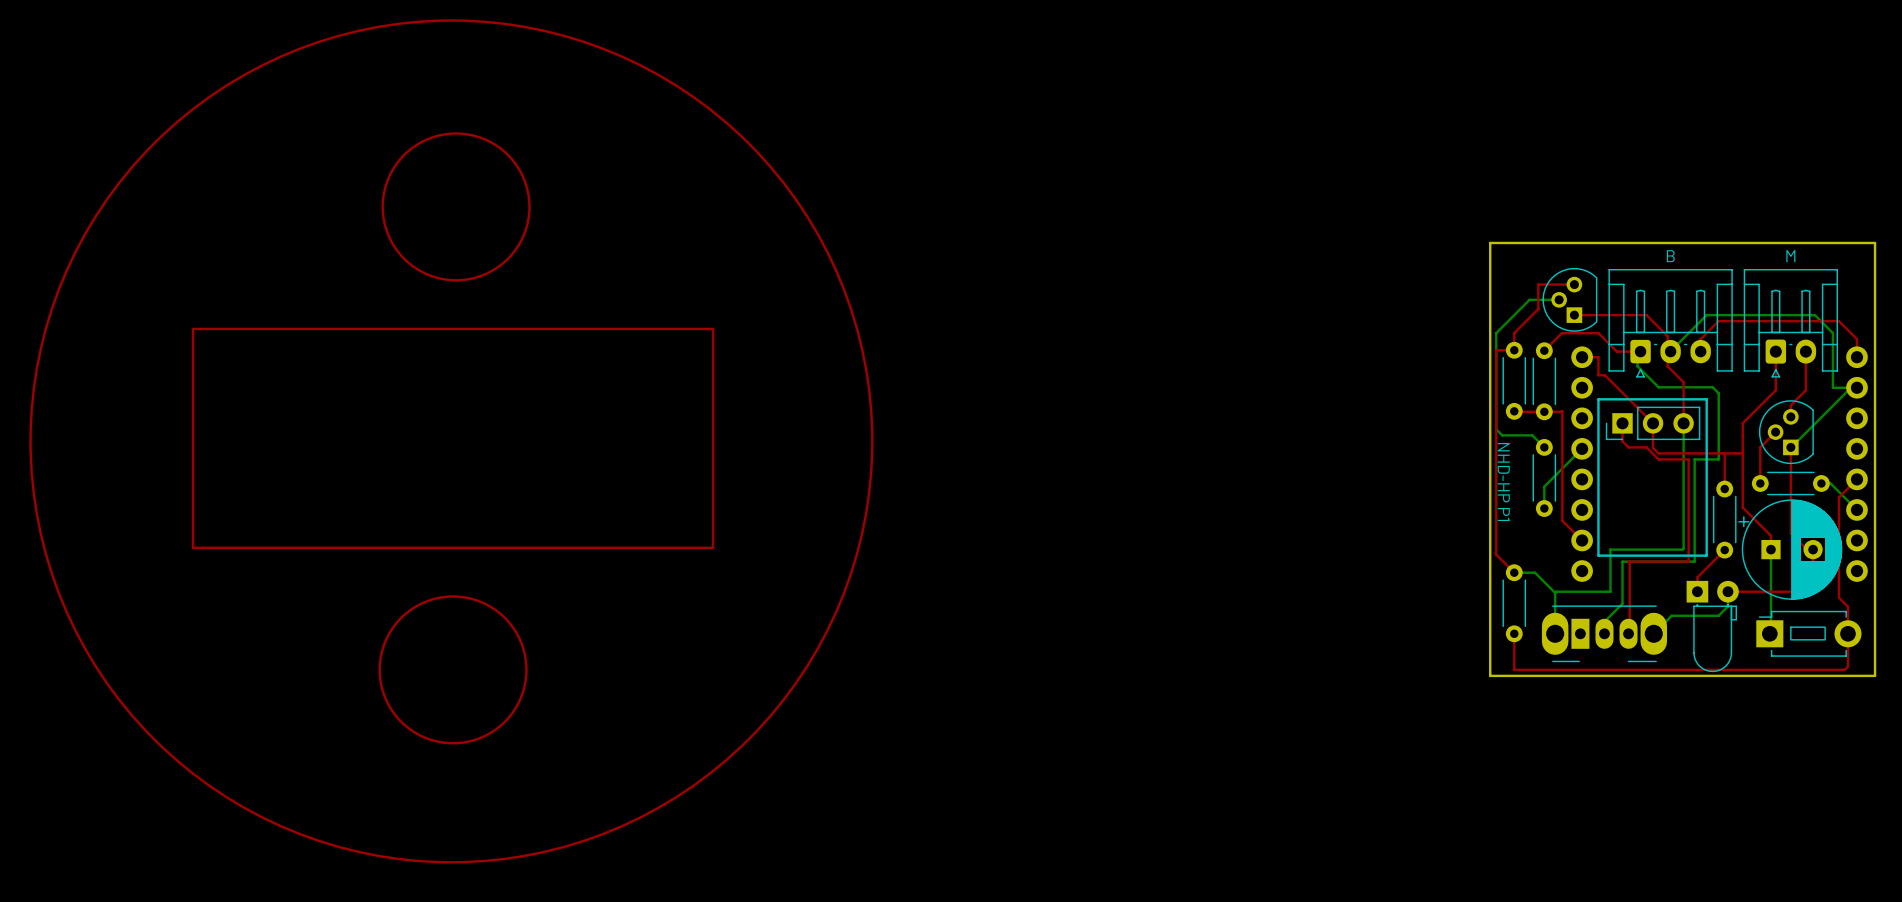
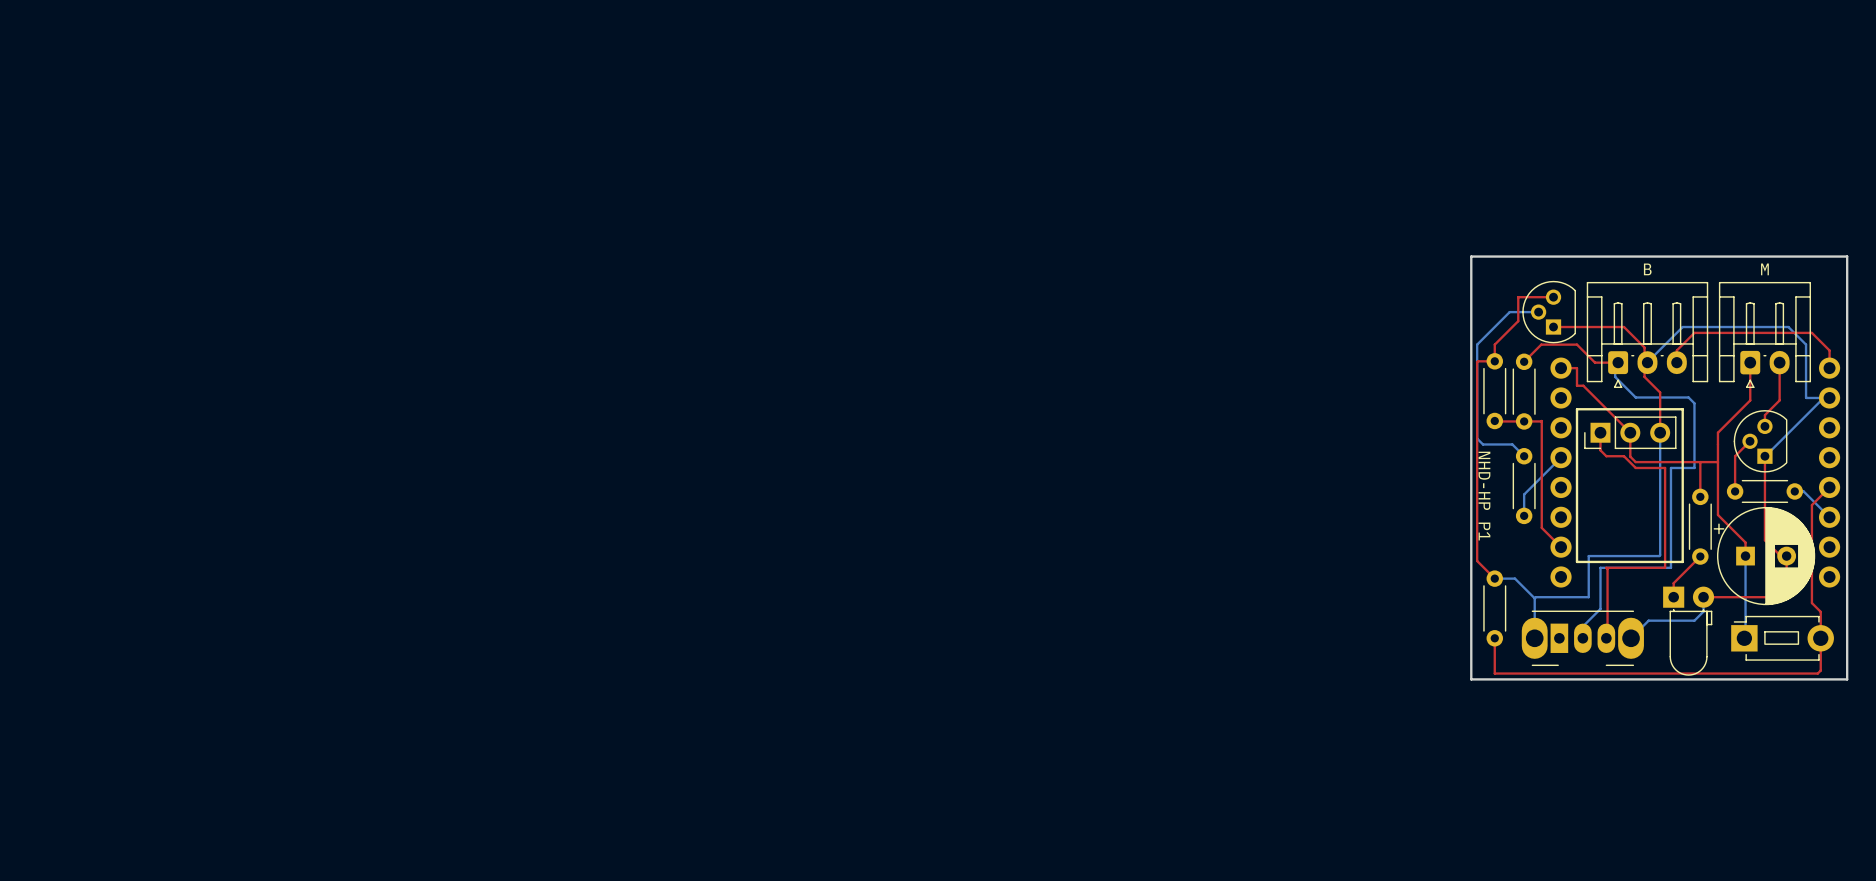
drawing: [29, 19, 874, 864] -> none
top track: (193, 328) (713, 328) (713, 547) (193, 547) (193, 328) -> none

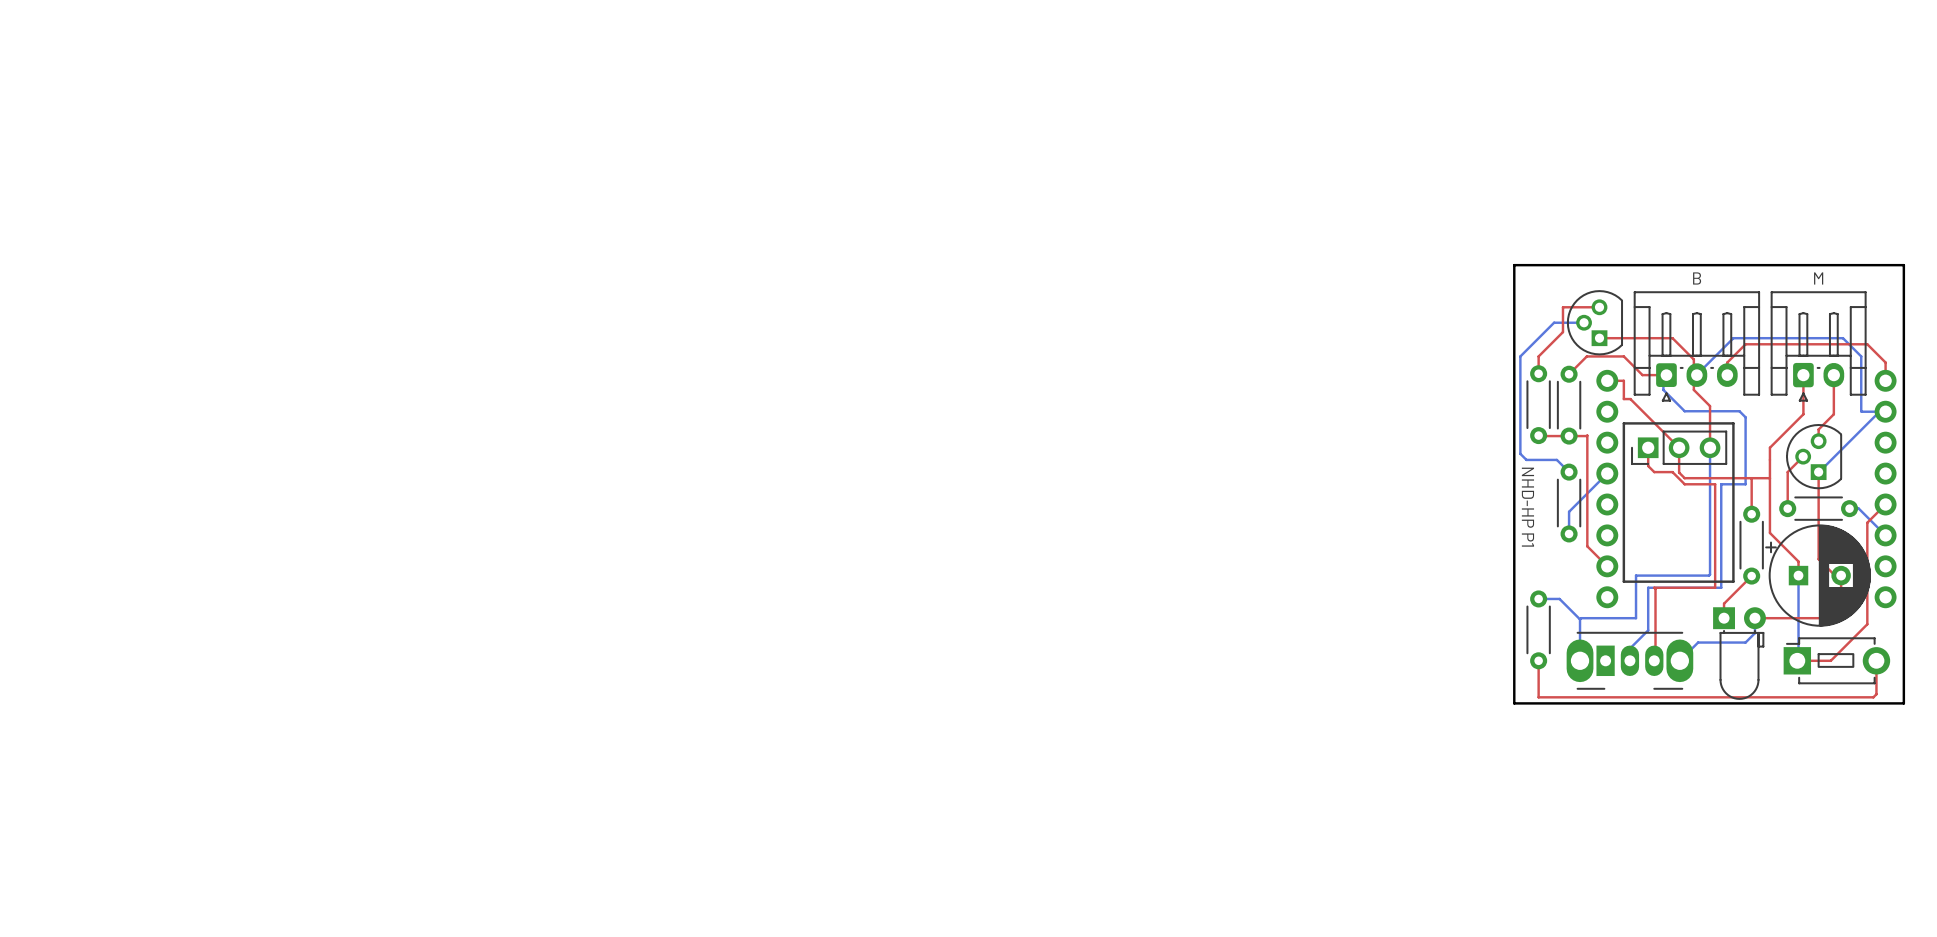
top track: (1494, 361) (1477, 362) (1477, 561) (1494, 578) -> none
top track: (1811, 603) (1820, 611) (1820, 638) -> (1867, 624) (1830, 660) (1797, 660)

